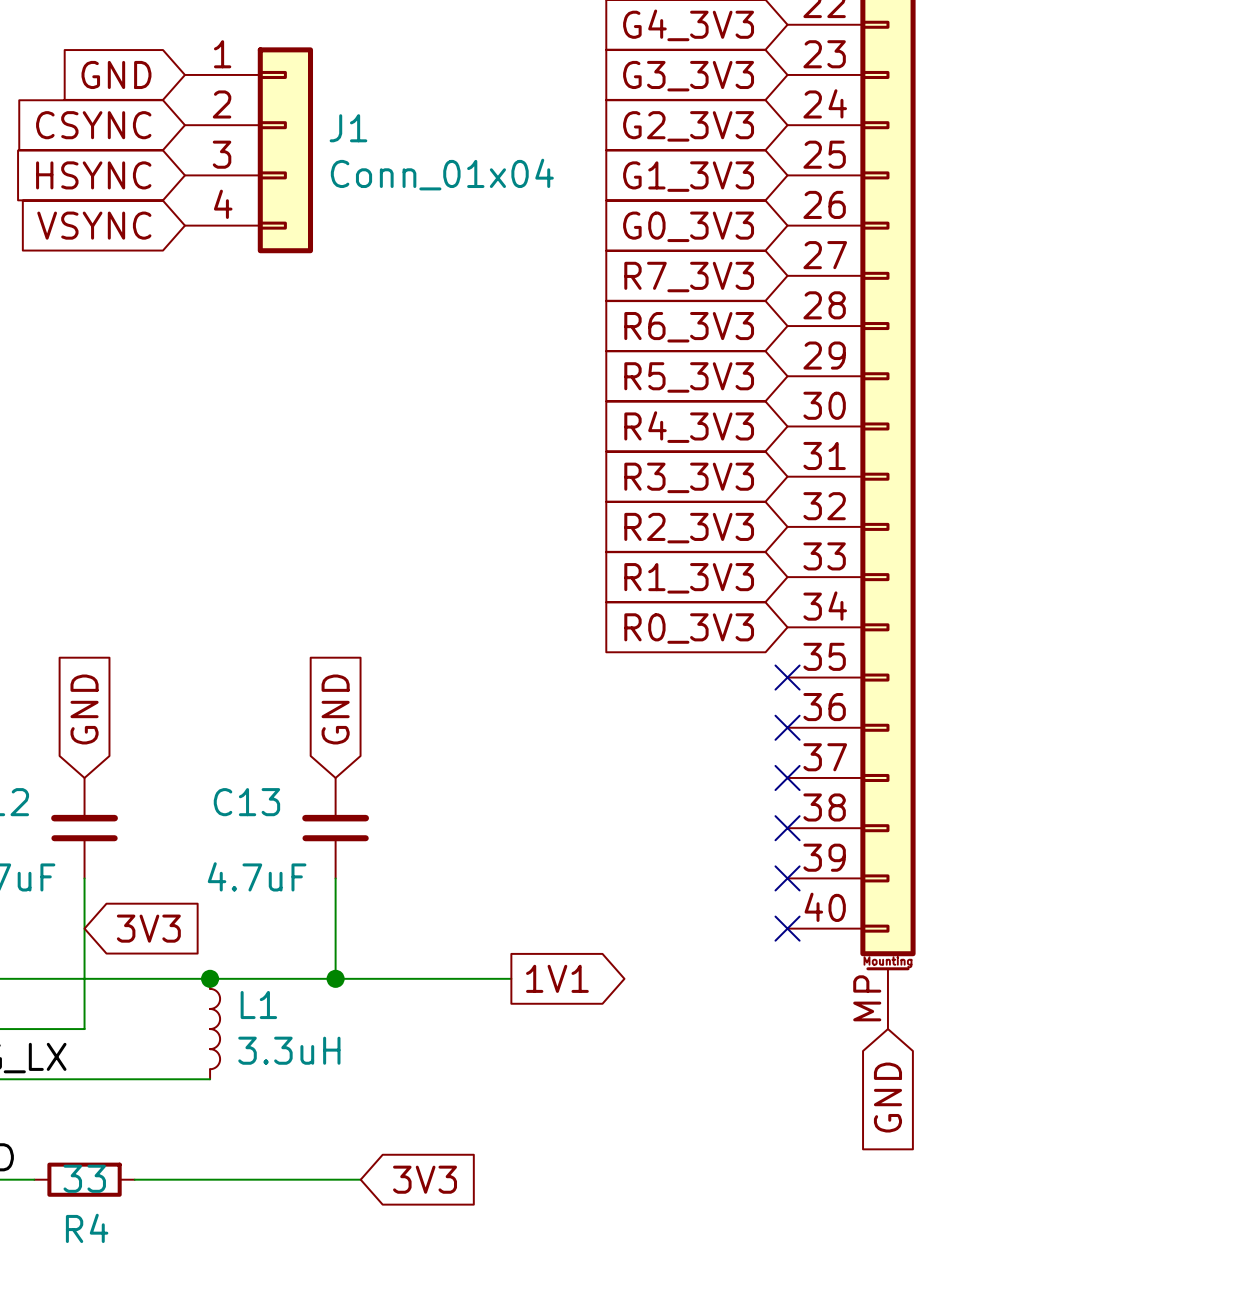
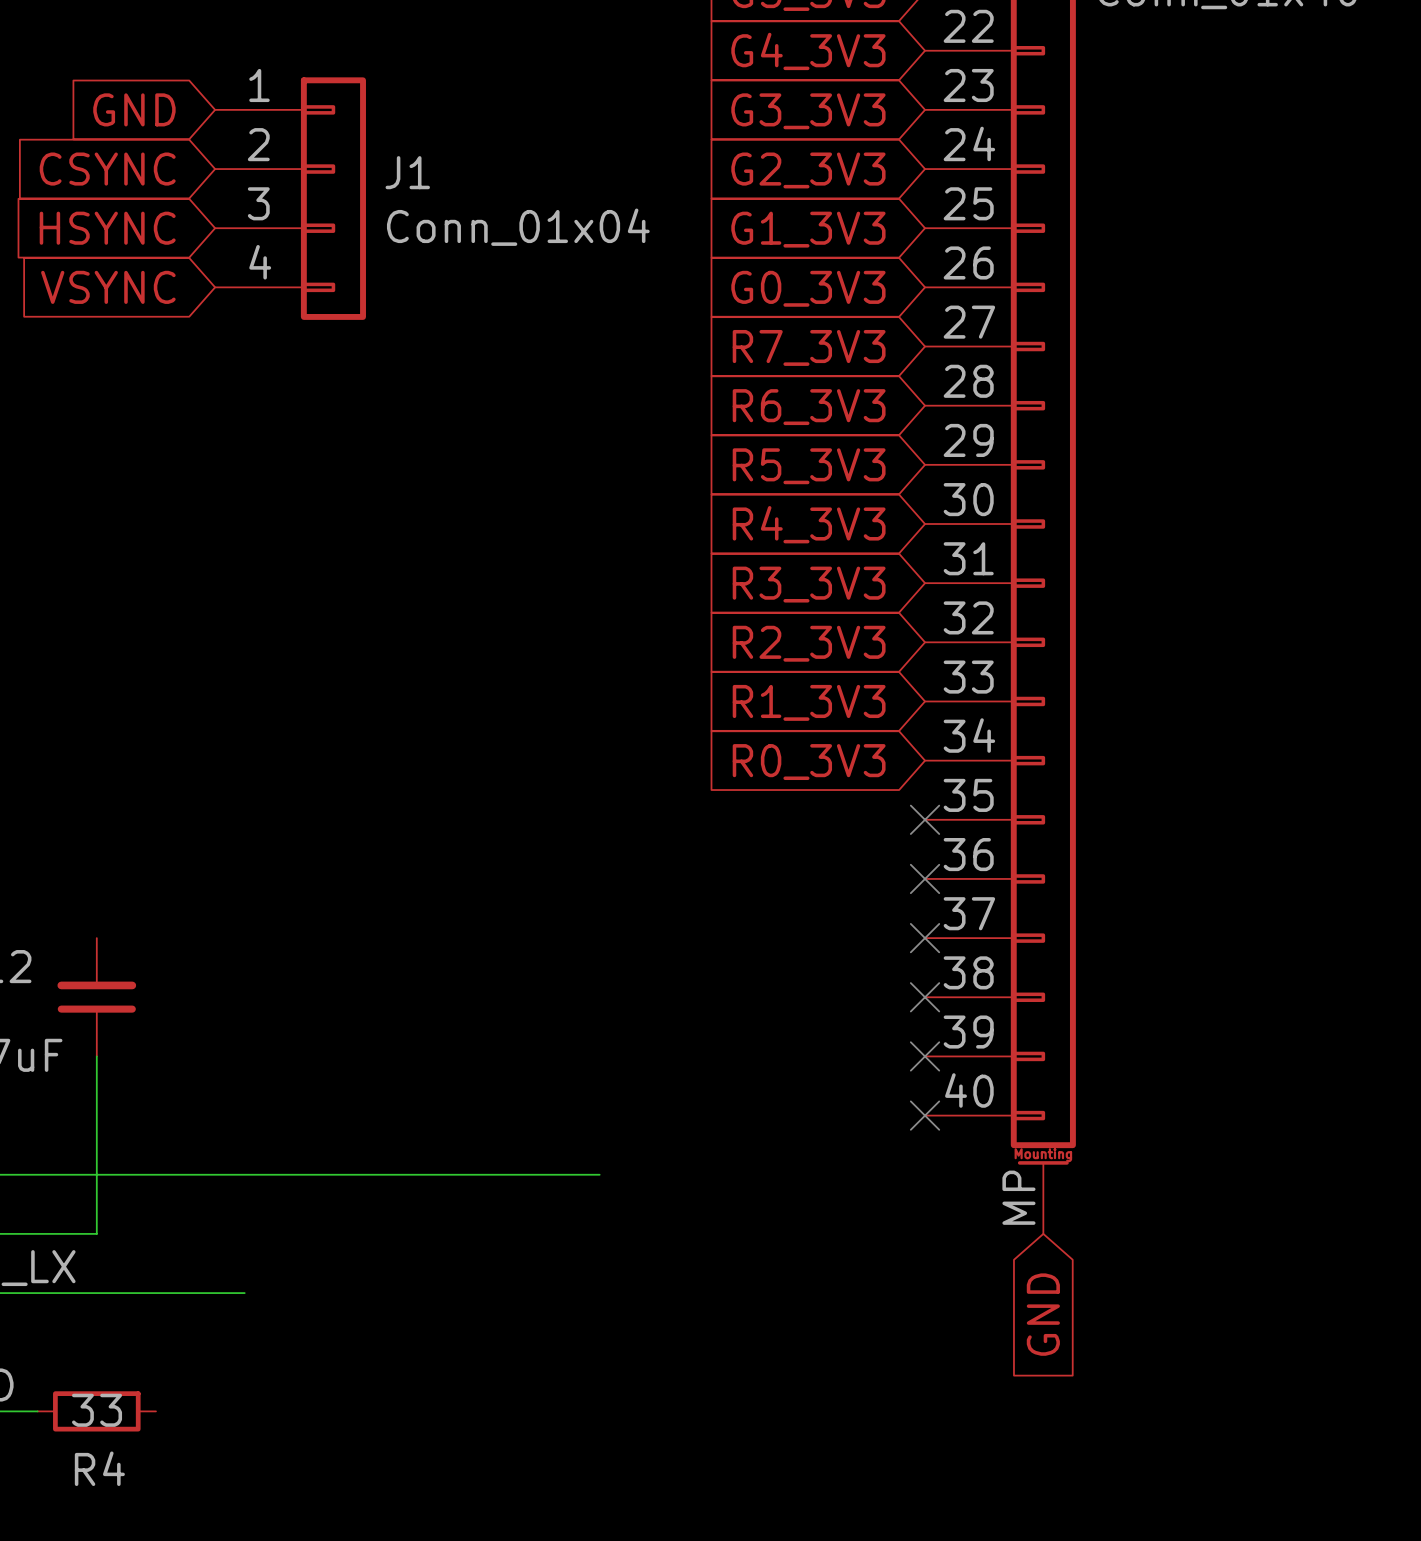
global label: GND (84, 709) -> none
global label: GND (335, 709) -> none
C13: 4.7uF (335, 828) -> none
wire: (335, 878) (335, 978) -> none
global label: 3V3 (148, 928) -> none
junction: (210, 978) -> none
junction: (335, 978) -> none
global label: 1V1 (557, 978) -> none
L1: 3.3uH (215, 1029) -> none
wire: (134, 1179) (360, 1179) -> none
global label: 3V3 (425, 1179) -> none

